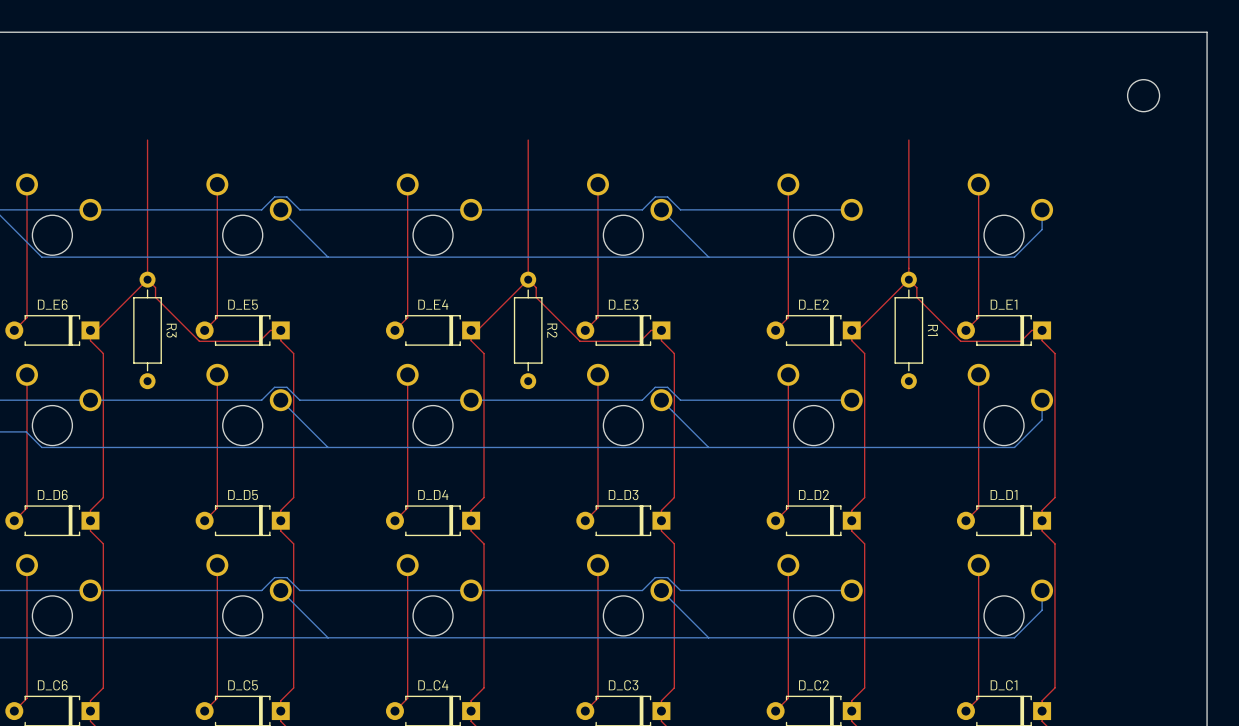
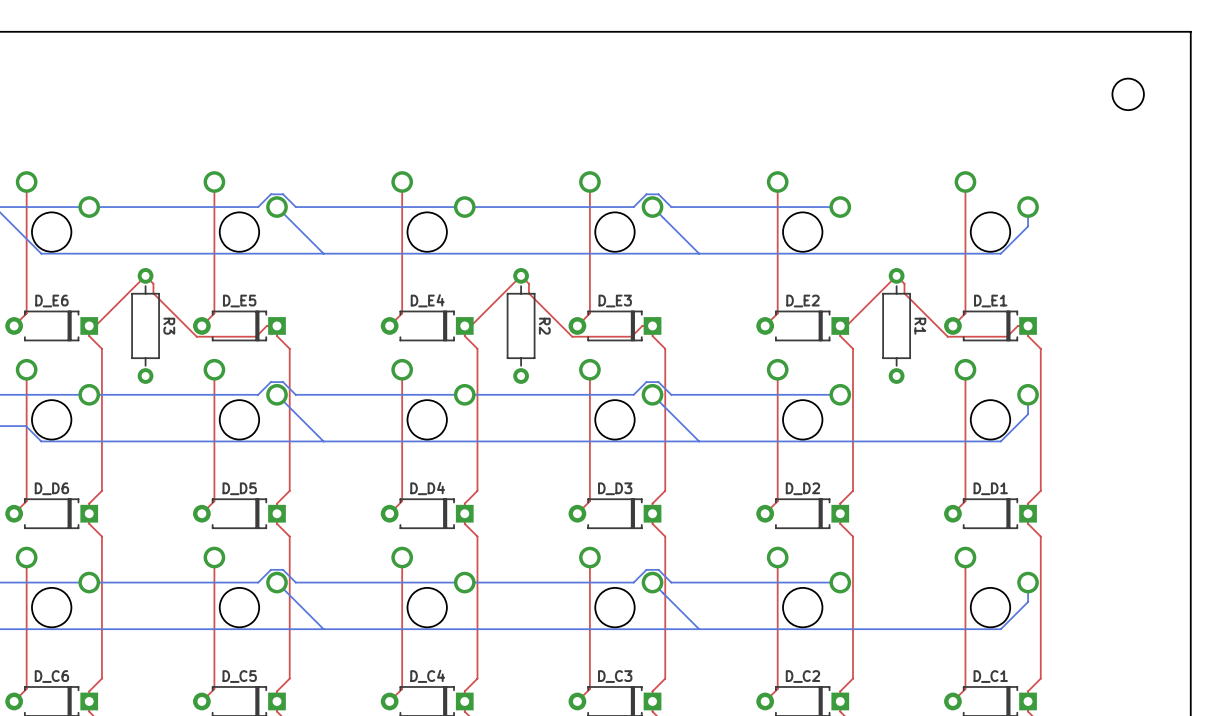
top track: (147, 140) (147, 279) -> none
top track: (528, 140) (528, 279) -> none
top track: (908, 140) (908, 279) -> none

